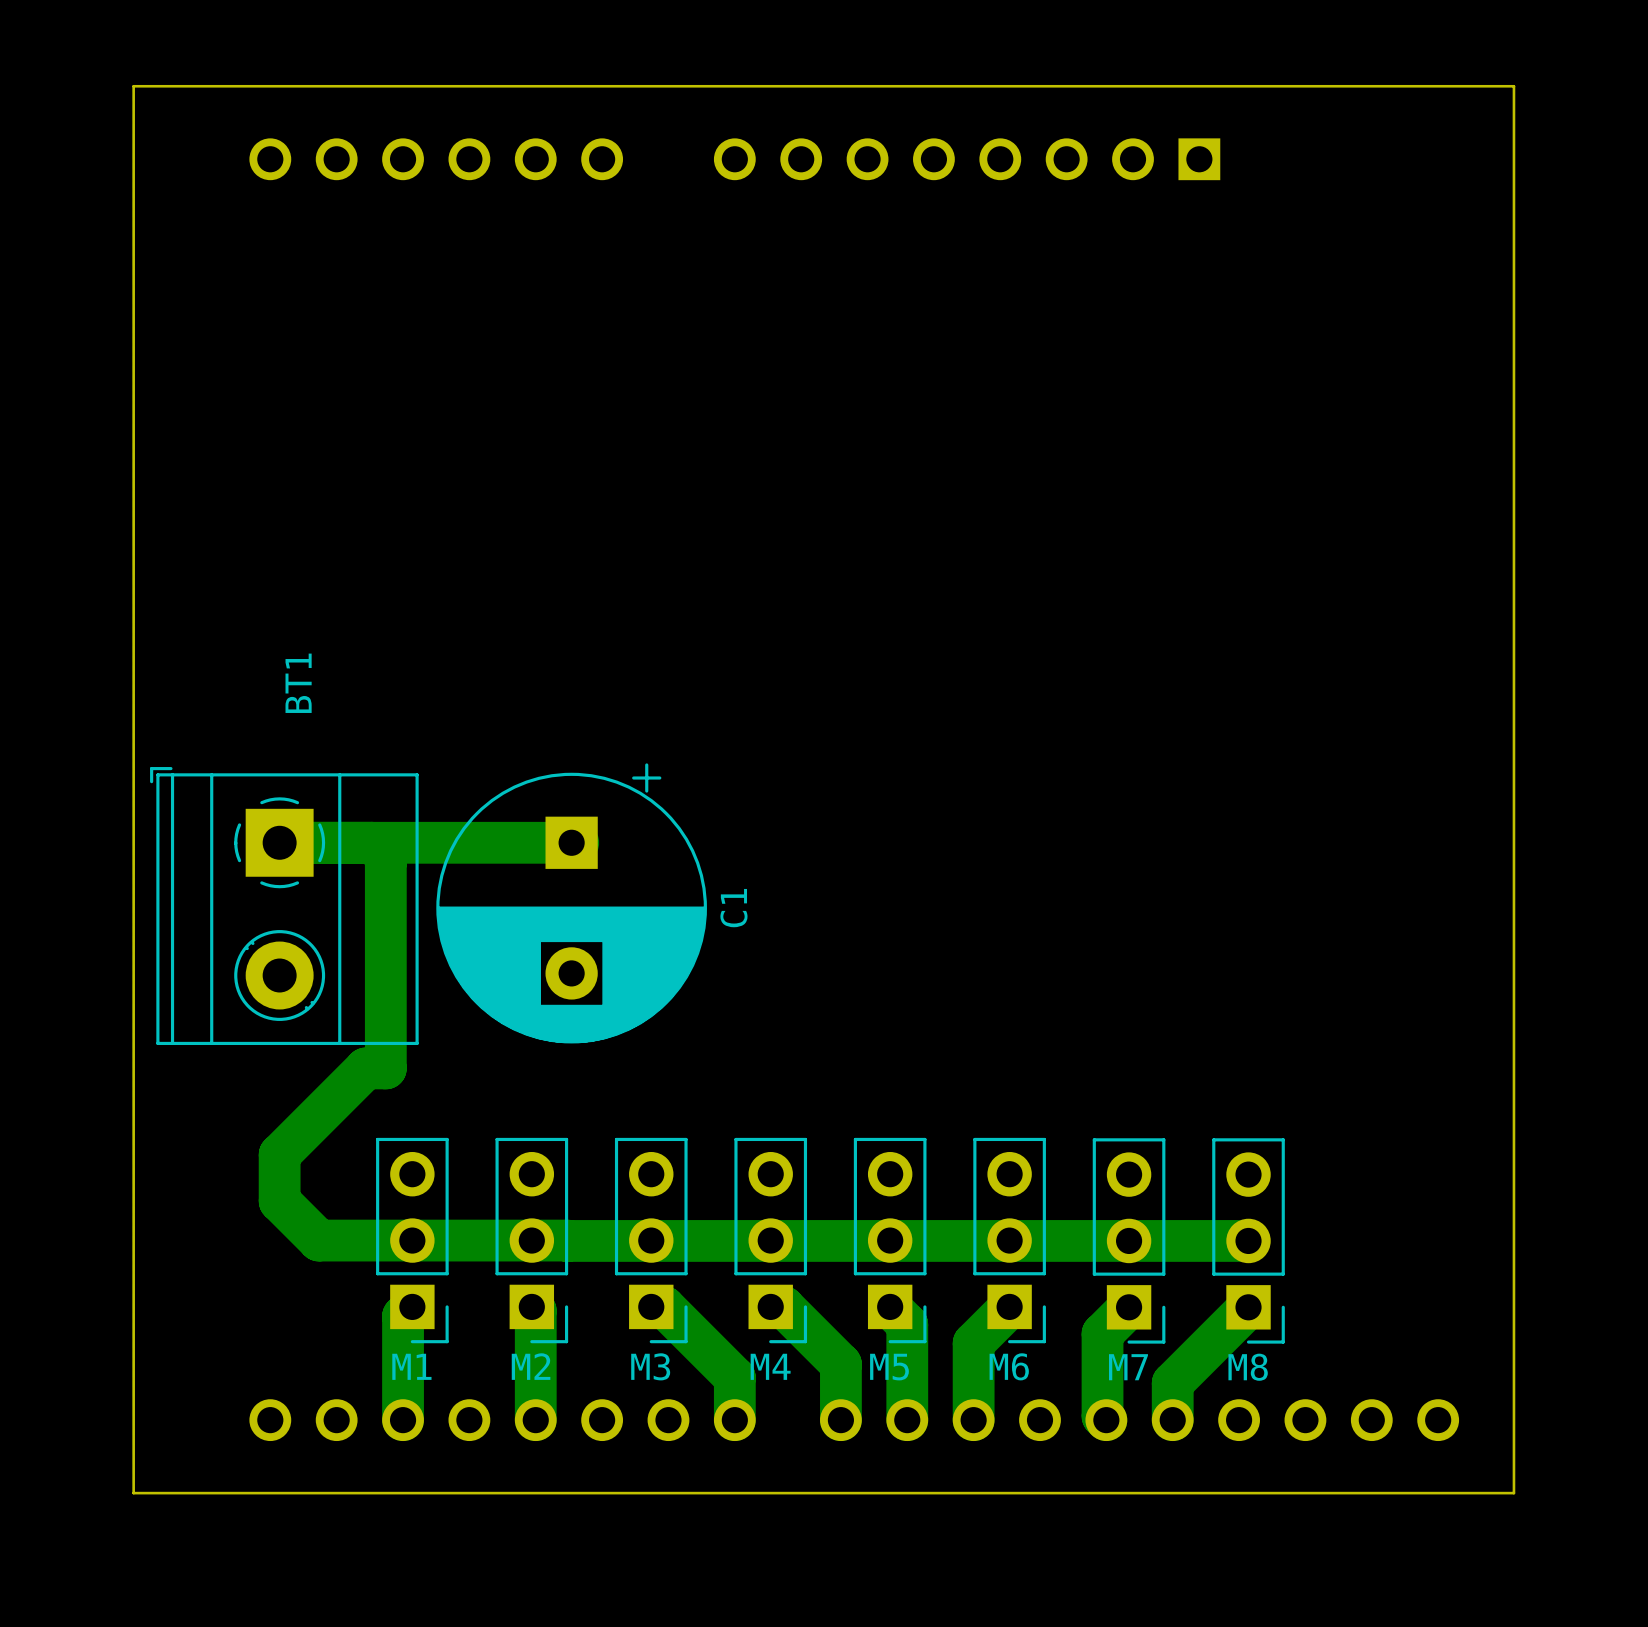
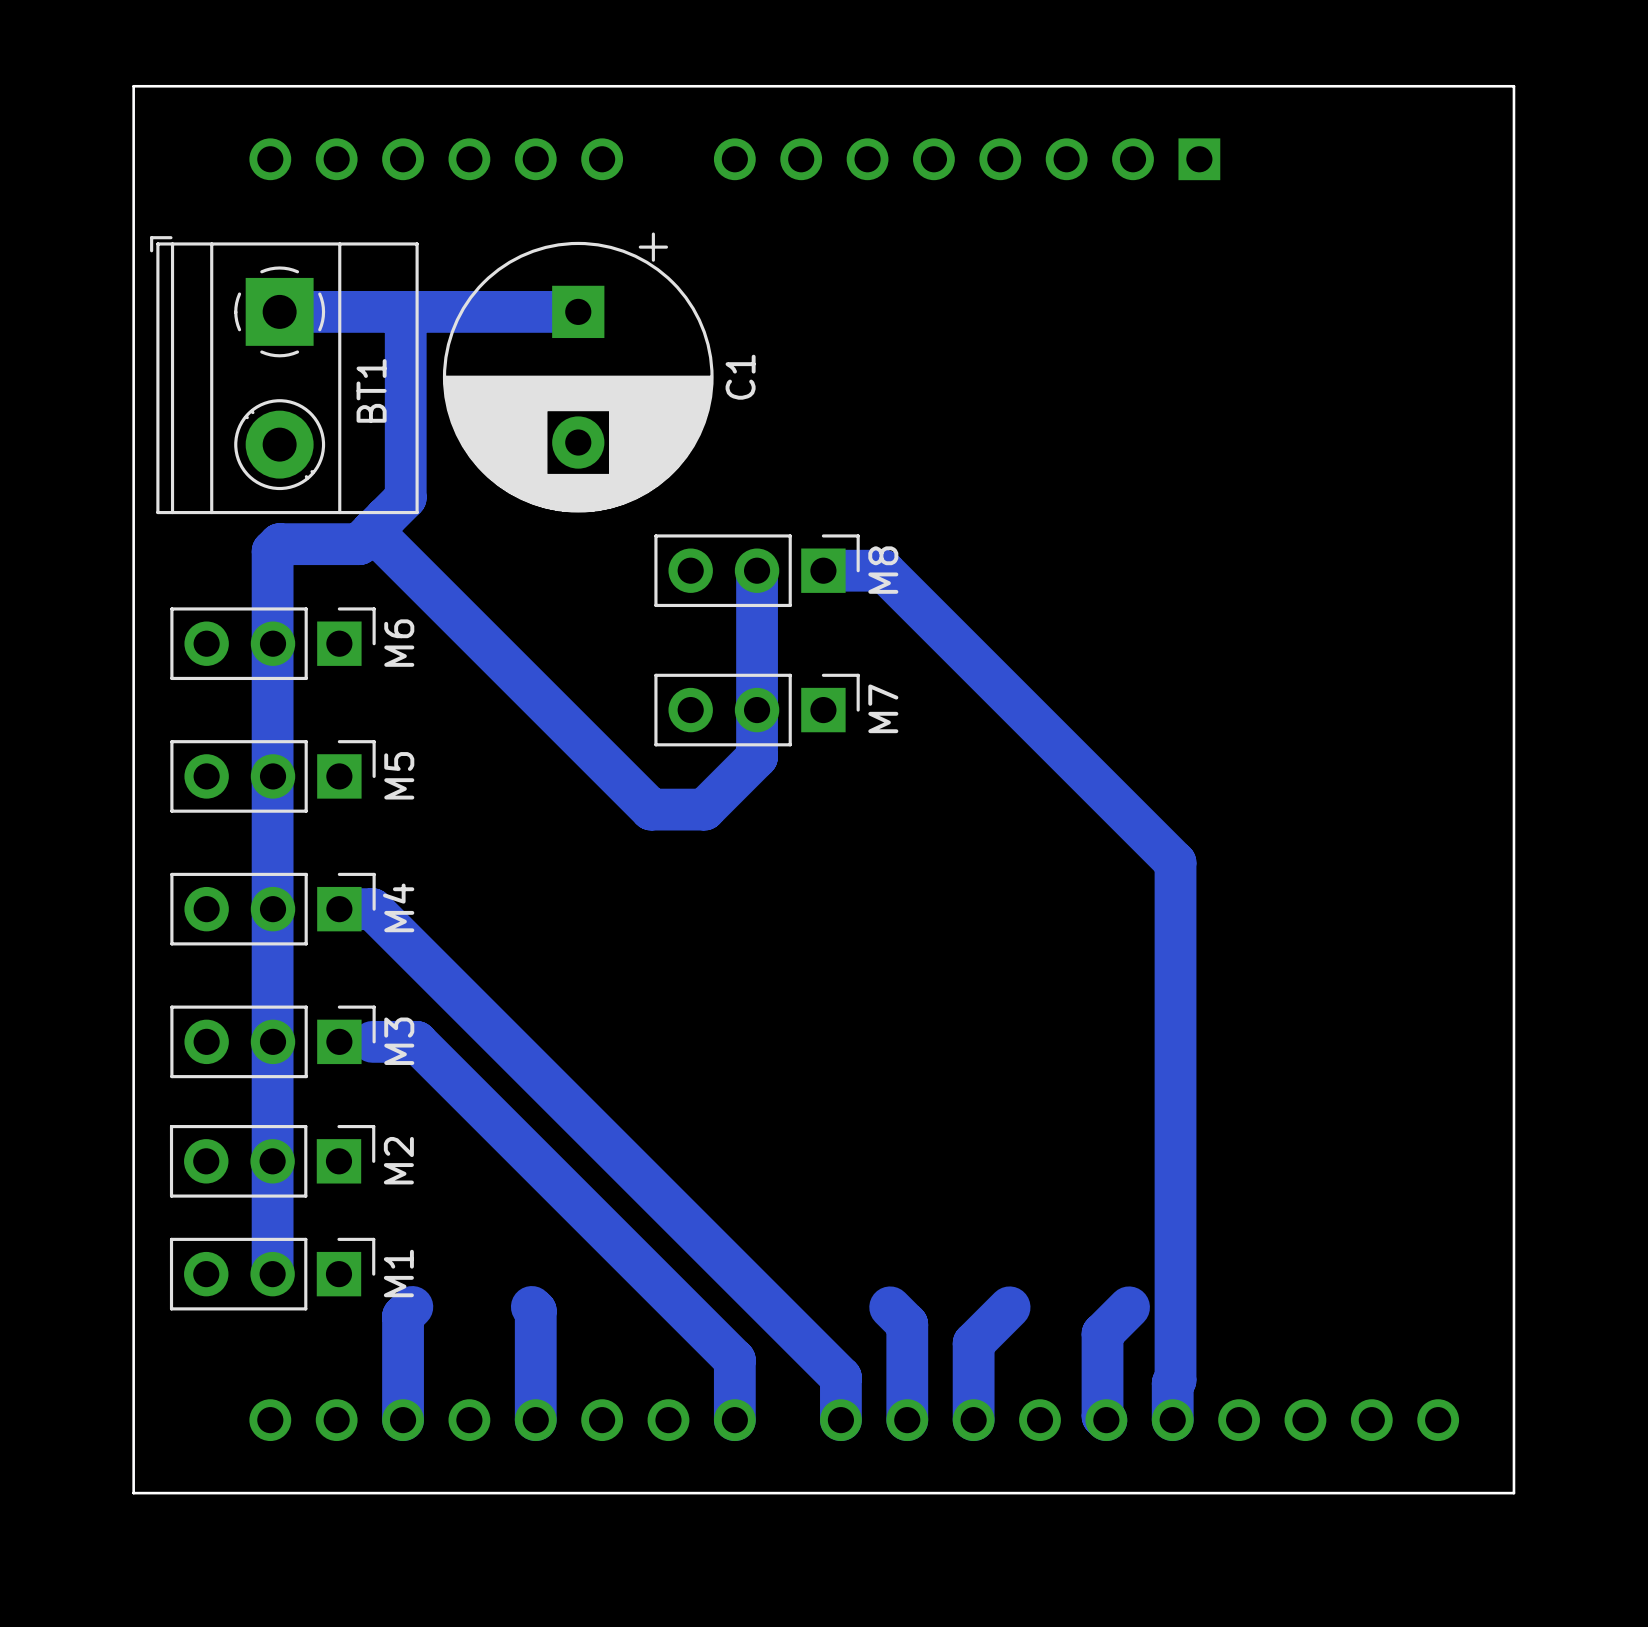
bottom track: none -> (405, 311) (405, 497) (359, 544) (279, 544) (272, 551) (272, 1274)
bottom track: none -> (372, 530) (651, 809) (704, 809) (757, 756) (757, 570)
BT1 name position: BT1 (298, 683) -> BT1 (371, 390)
bottom track: (279, 842) (578, 842) -> (279, 311) (578, 311)
bottom track: (372, 842) (385, 856) (385, 1068) (365, 1068) (279, 1154) (279, 1201) (319, 1240) (1248, 1240) -> none
C1 position: (571, 903) -> (578, 372)
BT1 position: (284, 906) -> (284, 375)
M1 rotation: 0° (412, 1240) -> 90° counterclockwise (272, 1274)
M1 position: (412, 1240) -> (272, 1274)
M2 rotation: 0° (531, 1240) -> 90° counterclockwise (272, 1161)
M2 position: (531, 1240) -> (272, 1161)
M3 rotation: 0° (651, 1240) -> 90° counterclockwise (273, 1041)
M3 position: (651, 1240) -> (273, 1041)
M4 rotation: 0° (770, 1240) -> 90° counterclockwise (273, 909)
M4 position: (770, 1240) -> (273, 909)
M5 rotation: 0° (890, 1240) -> 90° counterclockwise (273, 776)
M5 position: (890, 1240) -> (273, 776)
M6 rotation: 0° (1009, 1240) -> 90° counterclockwise (273, 643)
M6 position: (1009, 1240) -> (273, 643)
M7 rotation: 0° (1129, 1240) -> 90° counterclockwise (757, 710)
M7 position: (1129, 1240) -> (757, 710)
M8 rotation: 0° (1248, 1240) -> 90° counterclockwise (757, 570)
M8 position: (1248, 1240) -> (757, 570)
bottom track: (651, 1306) (664, 1306) (734, 1377) -> (372, 1041) (416, 1041) (734, 1360) (734, 1377)
bottom track: (770, 1306) (783, 1306) (840, 1364) (840, 1377) -> (339, 909) (372, 909) (840, 1377)
bottom track: (1248, 1307) (1175, 1380) -> (823, 570) (883, 570) (1175, 862) (1175, 1380)

